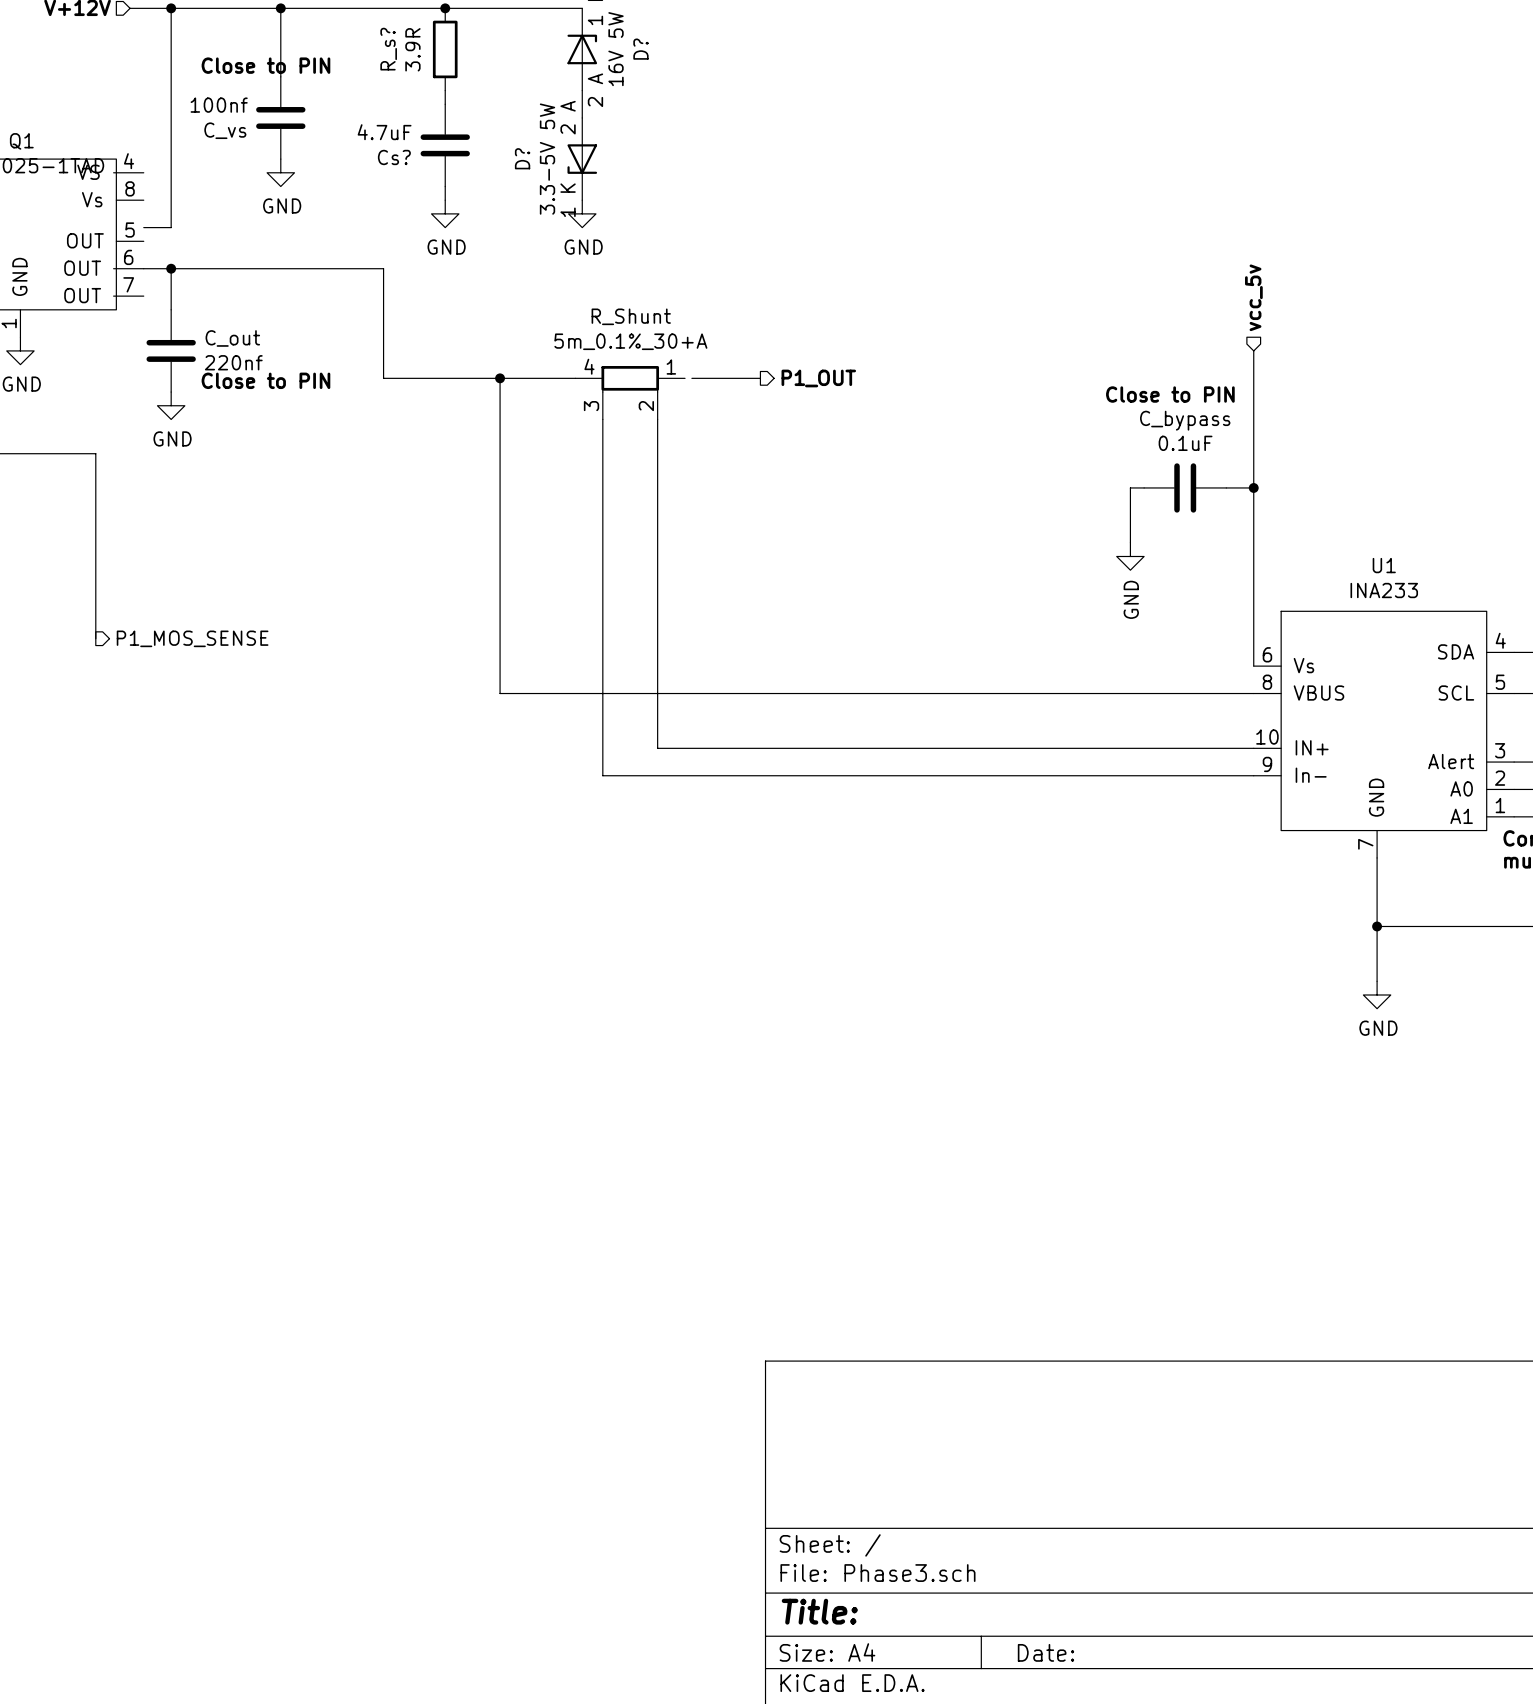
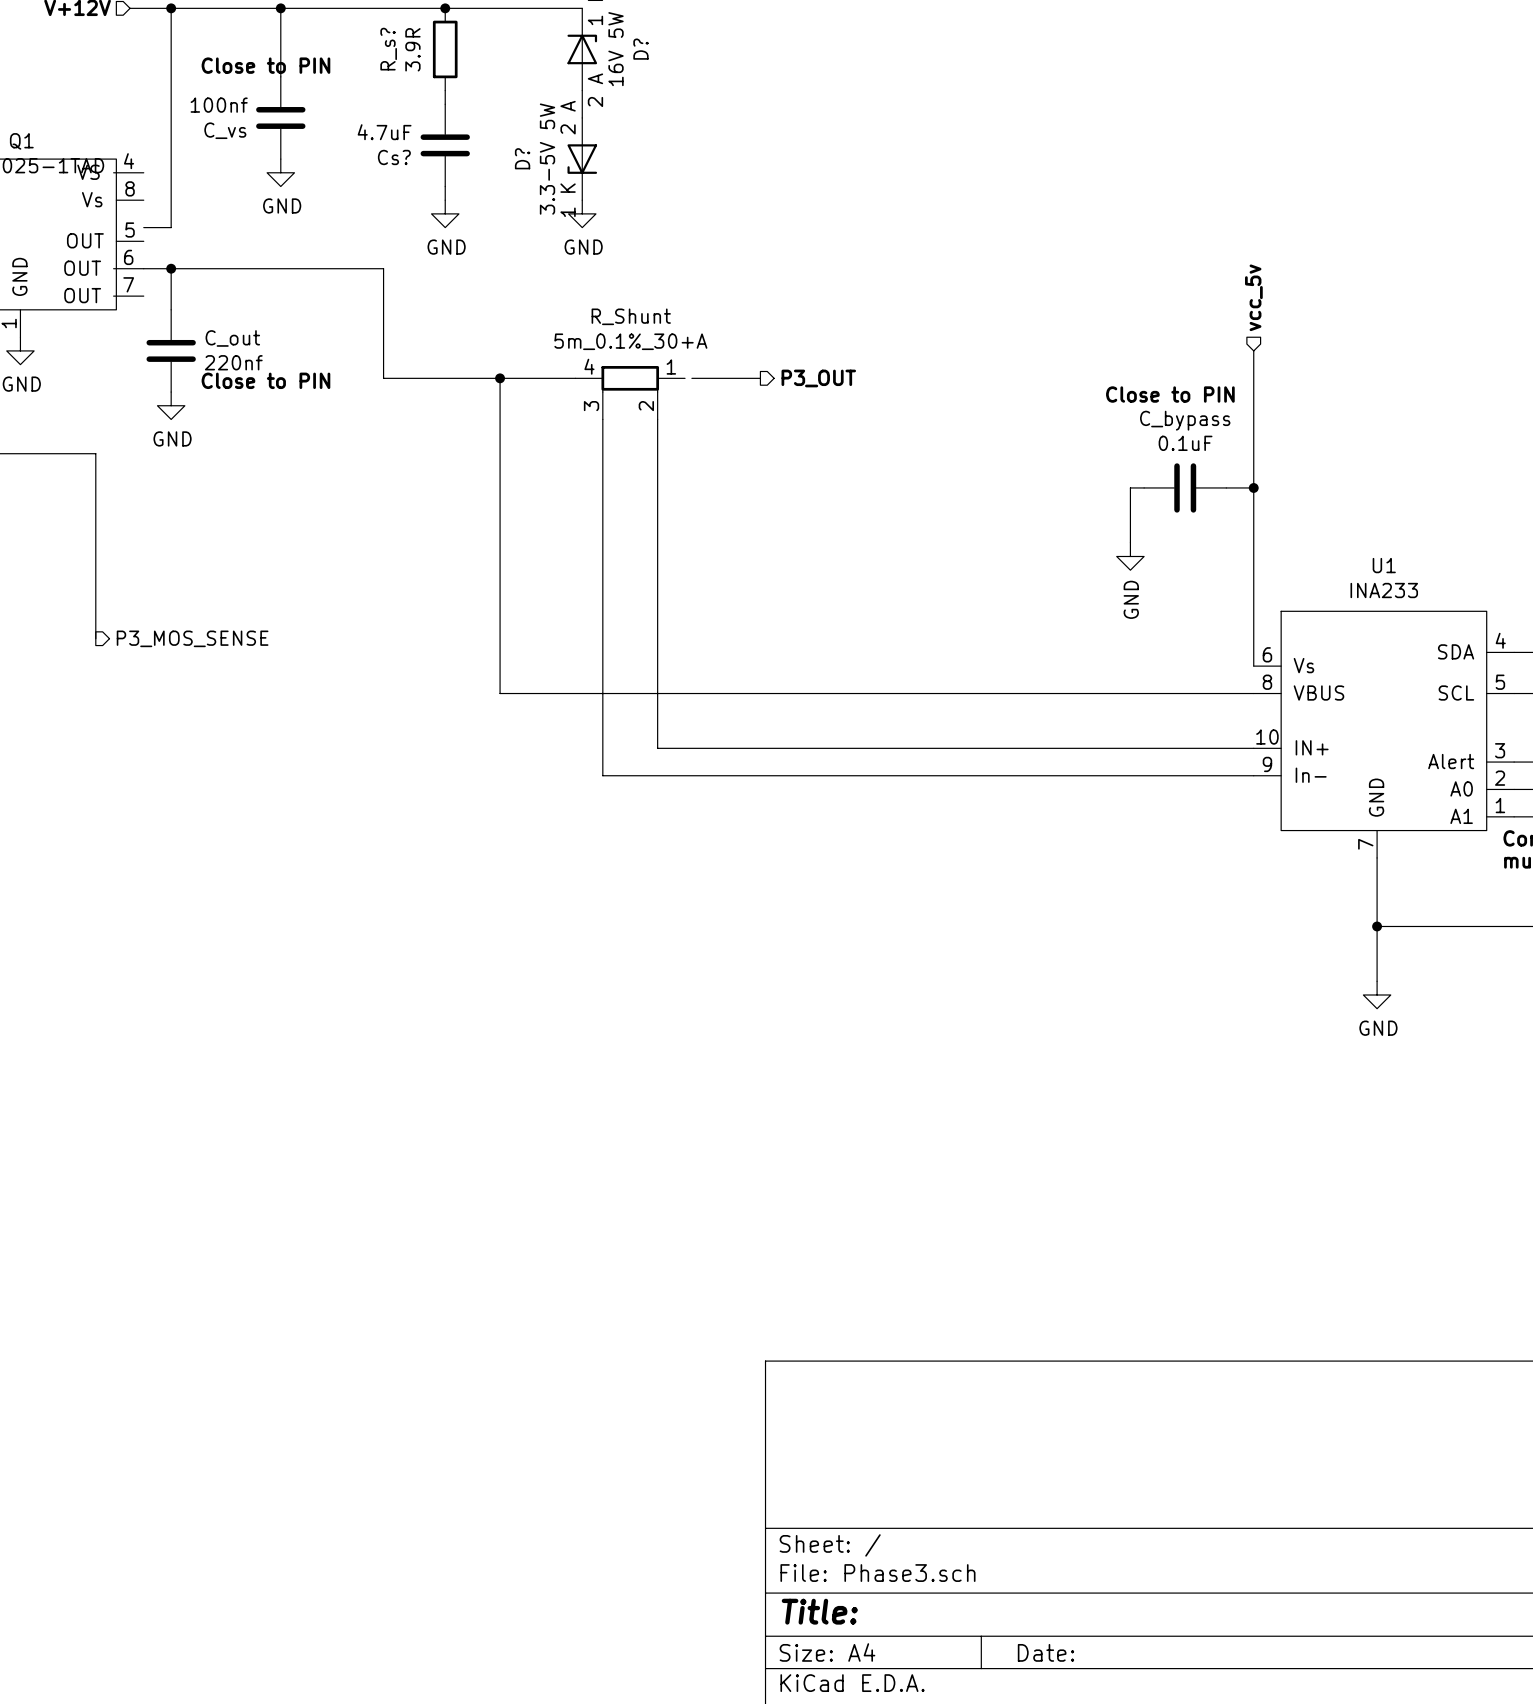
hierarchical label: P1_OUT (818, 378) -> P3_OUT (818, 378)
hierarchical label: P1_MOS_SENSE (192, 638) -> P3_MOS_SENSE (192, 638)

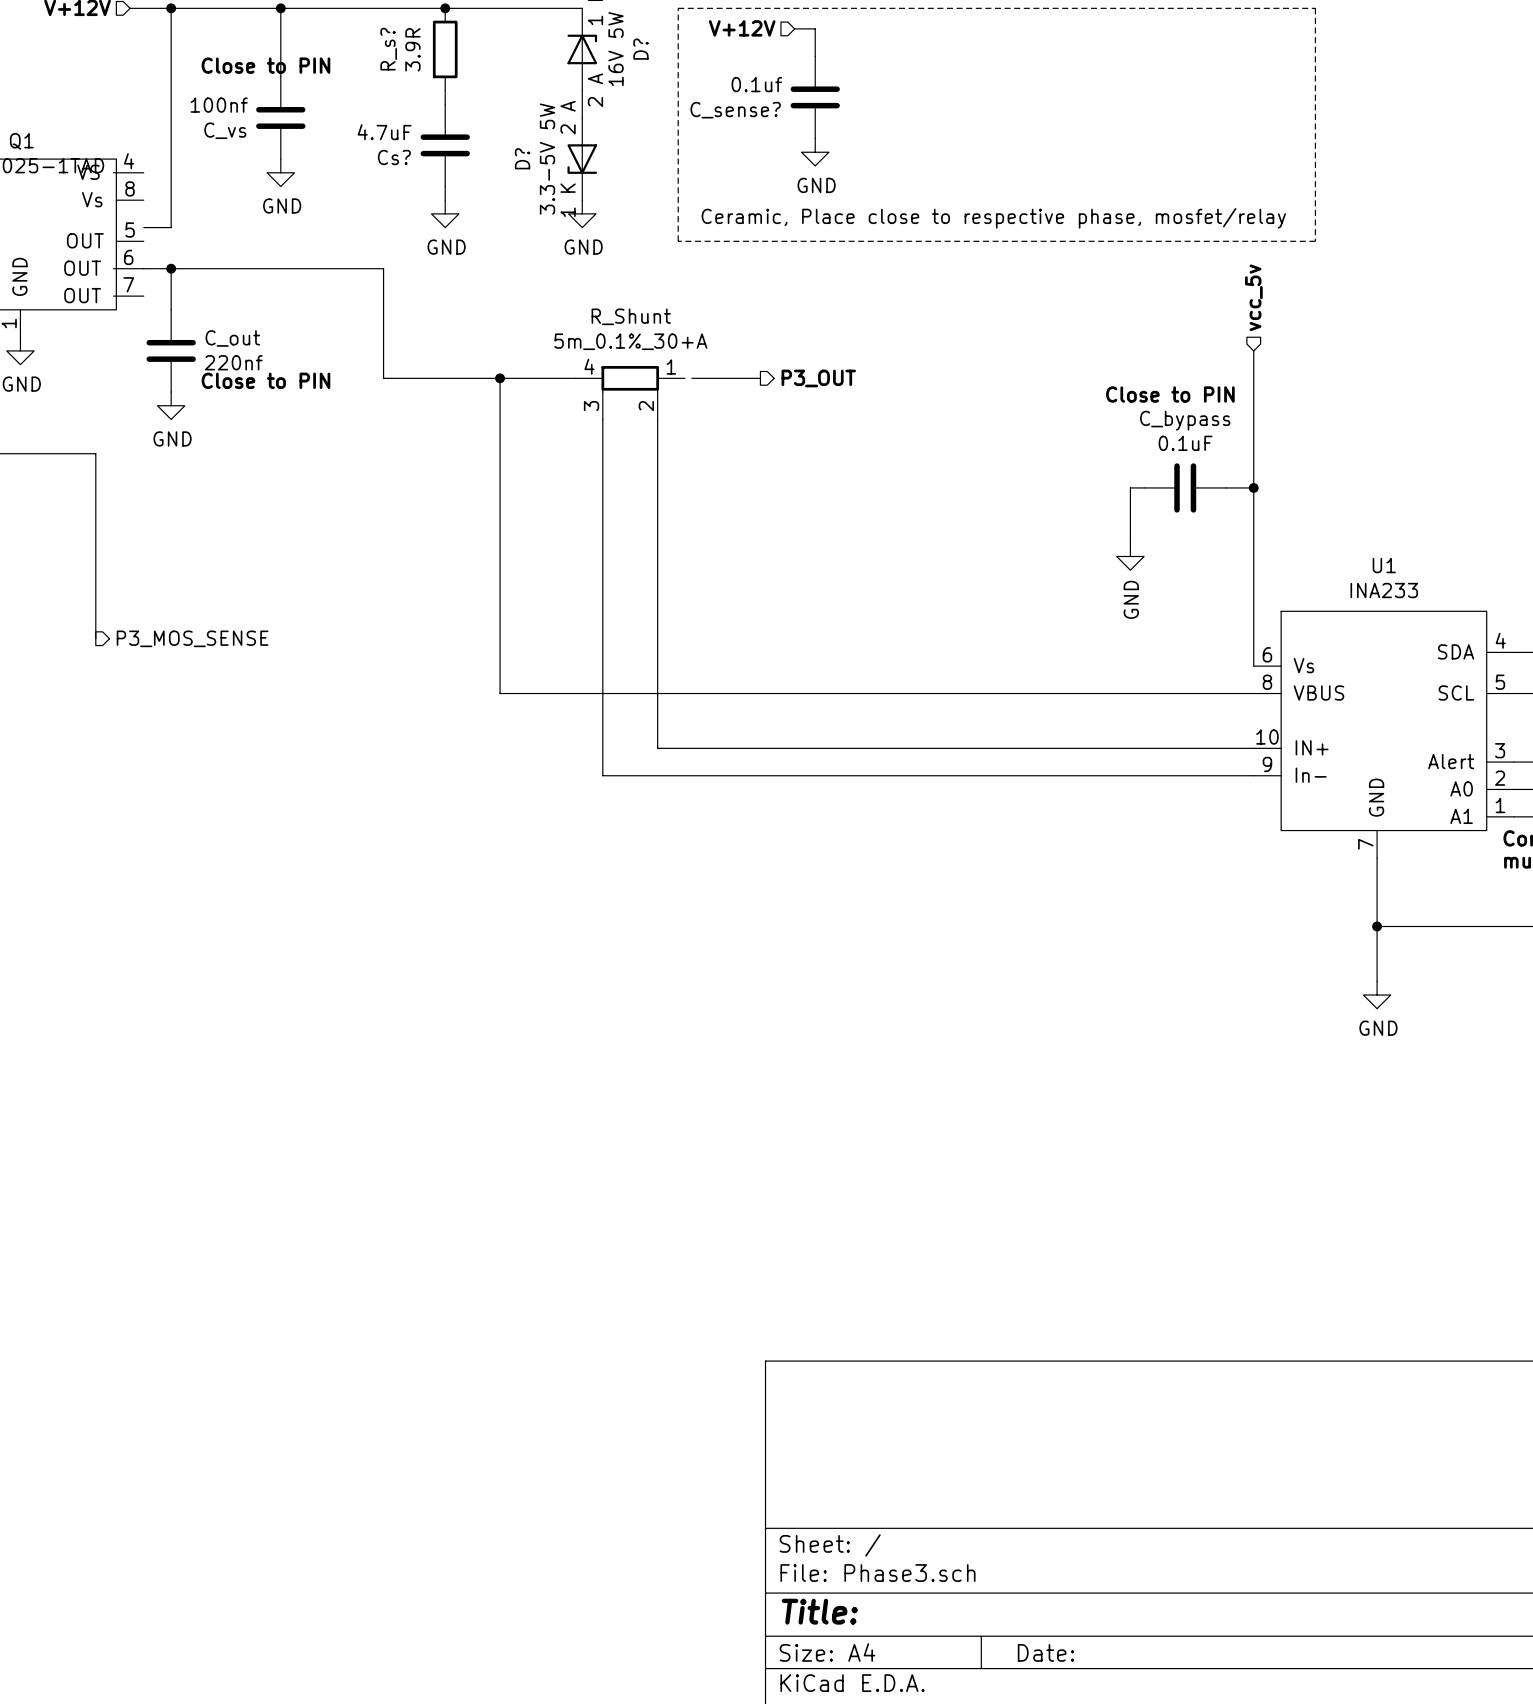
line: none -> (678, 8) (1315, 8) (1315, 241) (678, 241) (678, 8)
hierarchical label: none -> V+12V (742, 28)
wire: none -> (794, 28) (815, 28) (815, 56)
C_sense?: none -> 0.1uf (815, 97)
power symbol: none -> GND (815, 152)
text: none -> Ceramic, Place close to respective phase, mosfet/relay (993, 218)

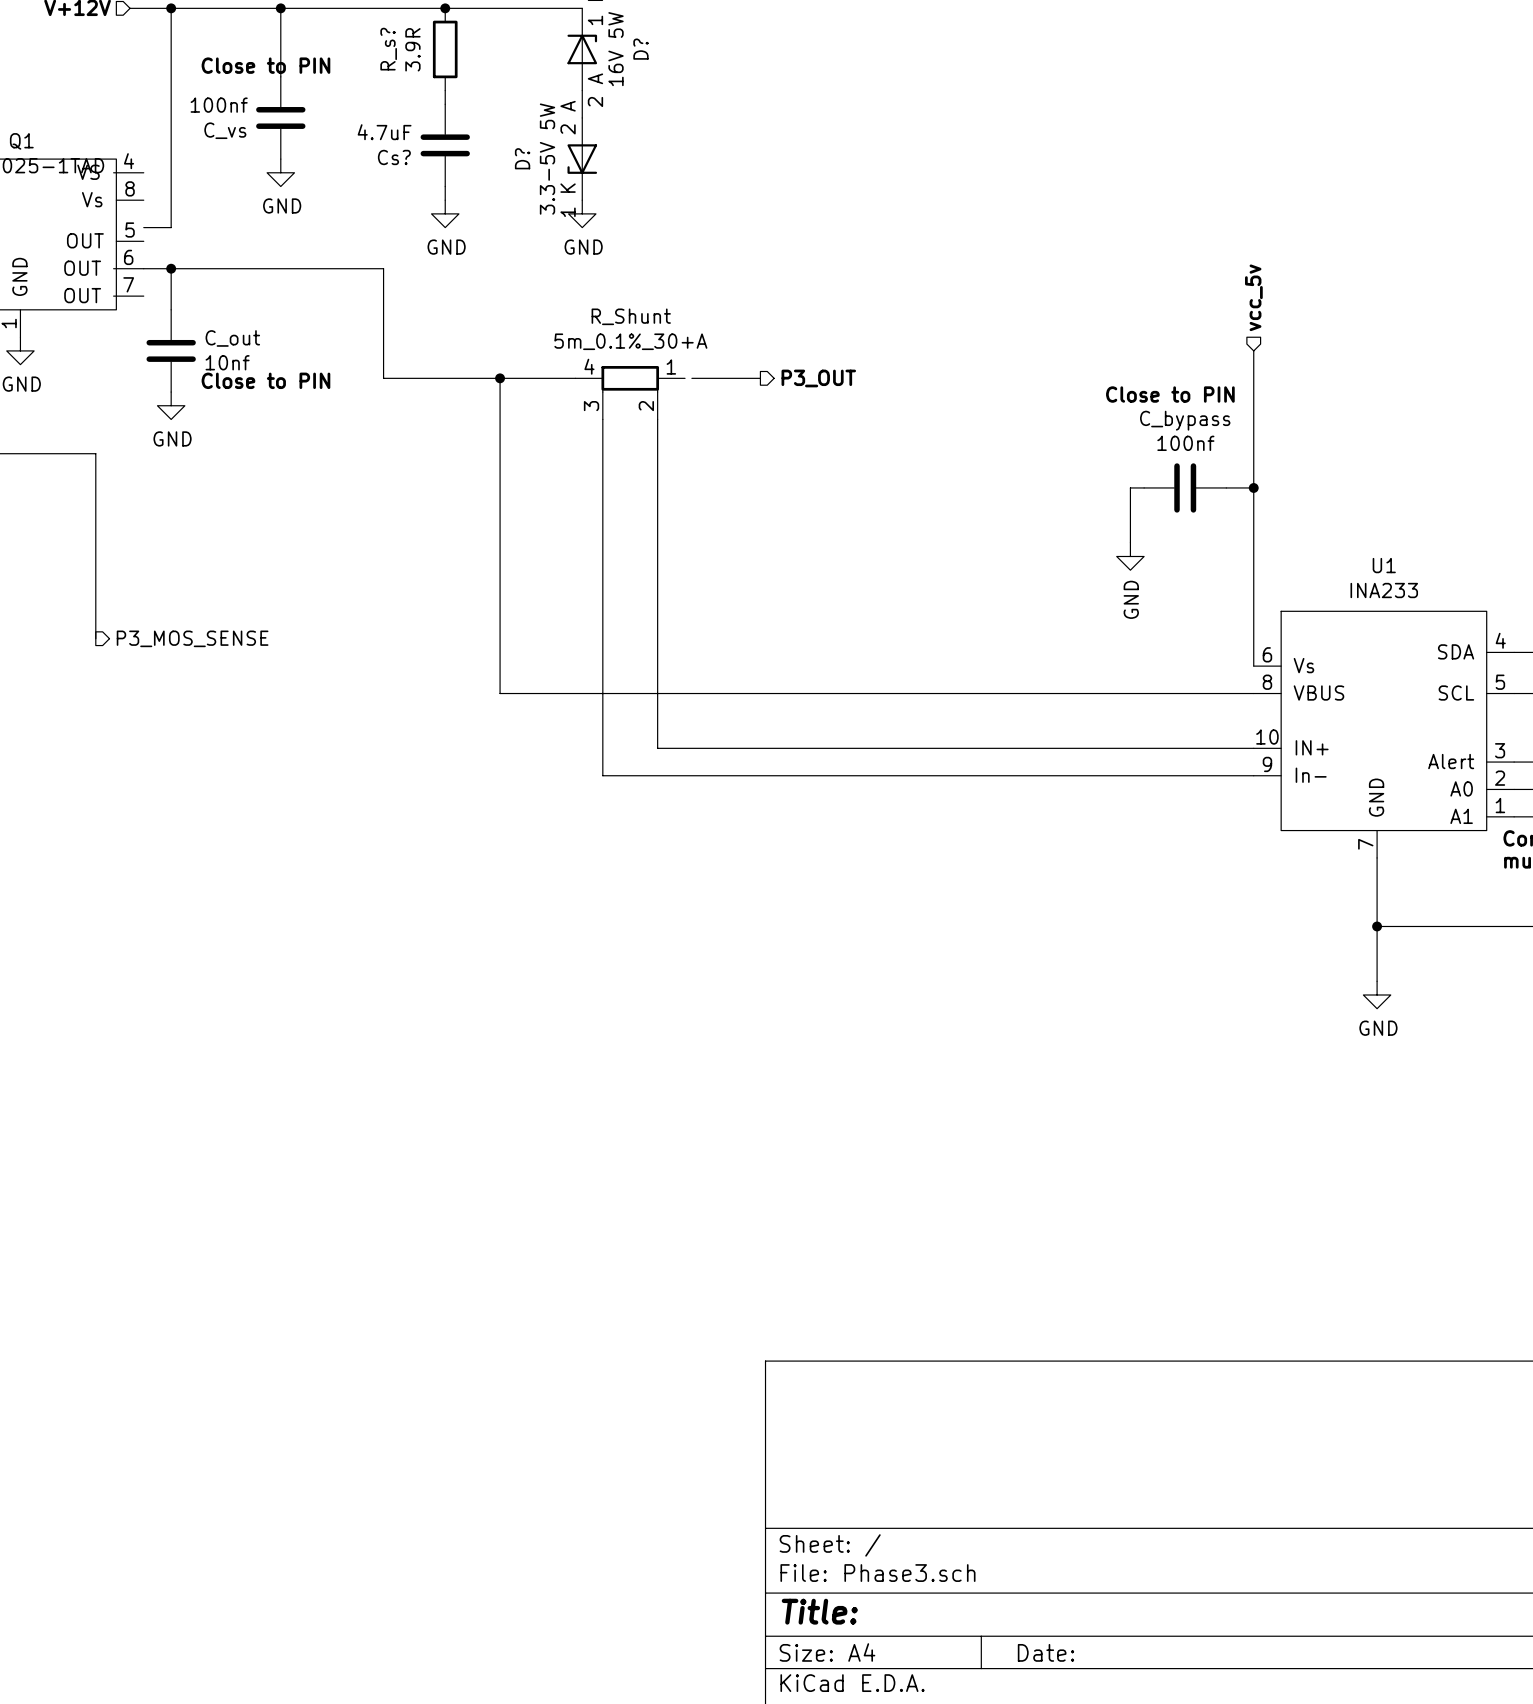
line: (678, 8) (1315, 8) (1315, 241) (678, 241) (678, 8) -> none
hierarchical label: V+12V (742, 28) -> none
wire: (794, 28) (815, 28) (815, 56) -> none
C_sense?: 0.1uf (815, 97) -> none
power symbol: GND (815, 152) -> none
text: Ceramic, Place close to respective phase, mosfet/relay (993, 218) -> none
C_out value: 220nf (233, 362) -> 10nf (227, 362)
C_bypass value: 0.1uF (1185, 443) -> 100nf (1185, 443)

